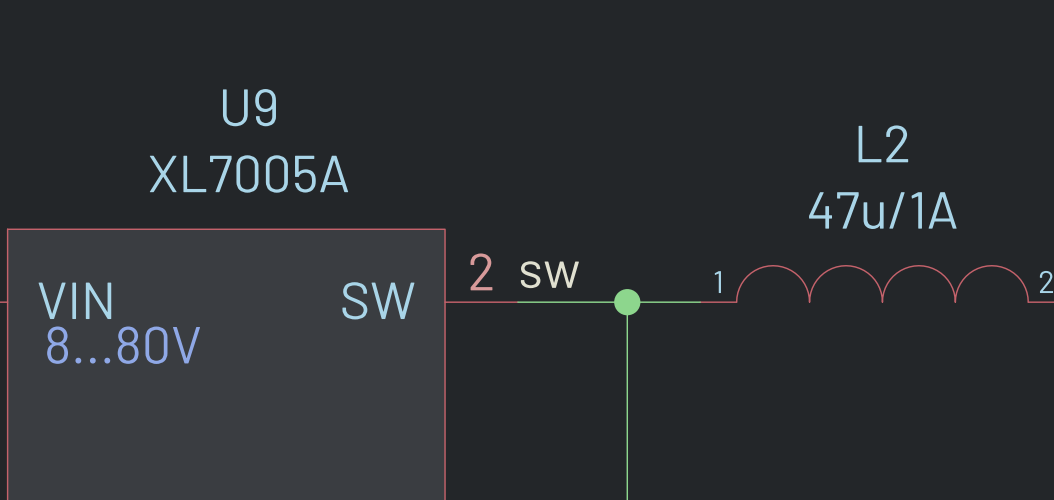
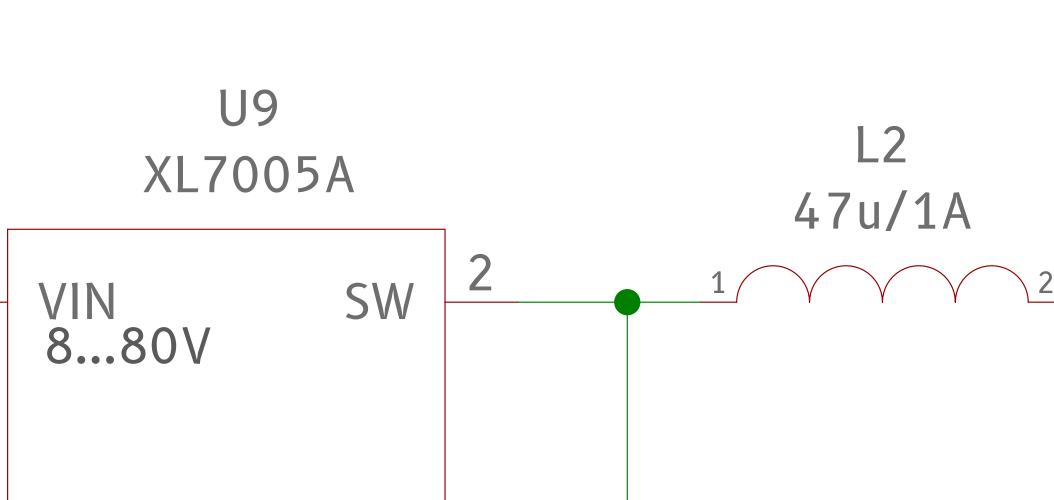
label: sw (549, 274) -> none

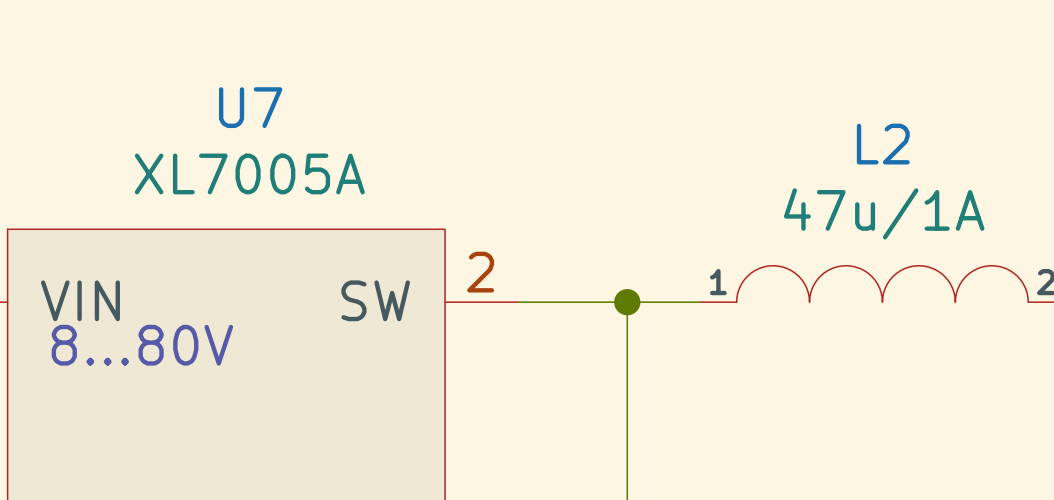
U9 name: U9 (248, 107) -> U7 (250, 107)

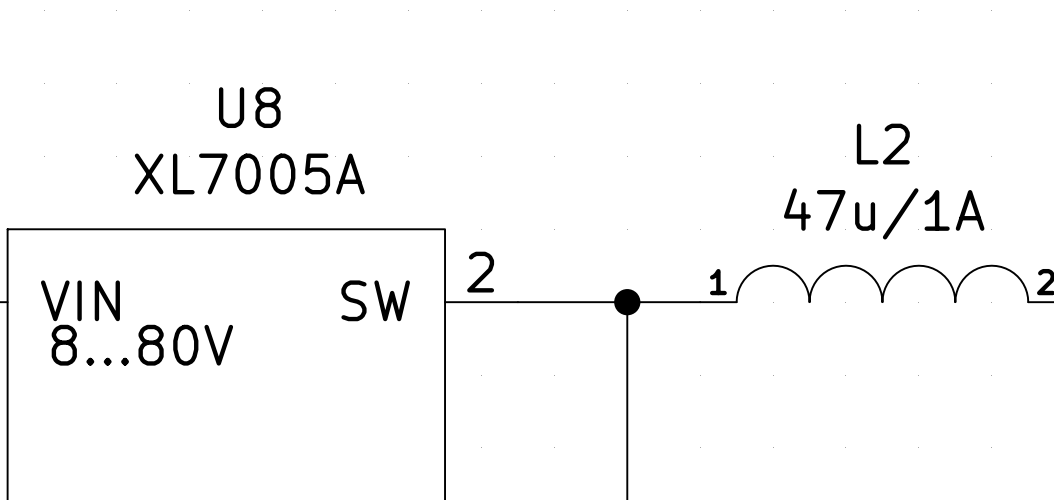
U7 name: U7 (250, 107) -> U8 (249, 107)

